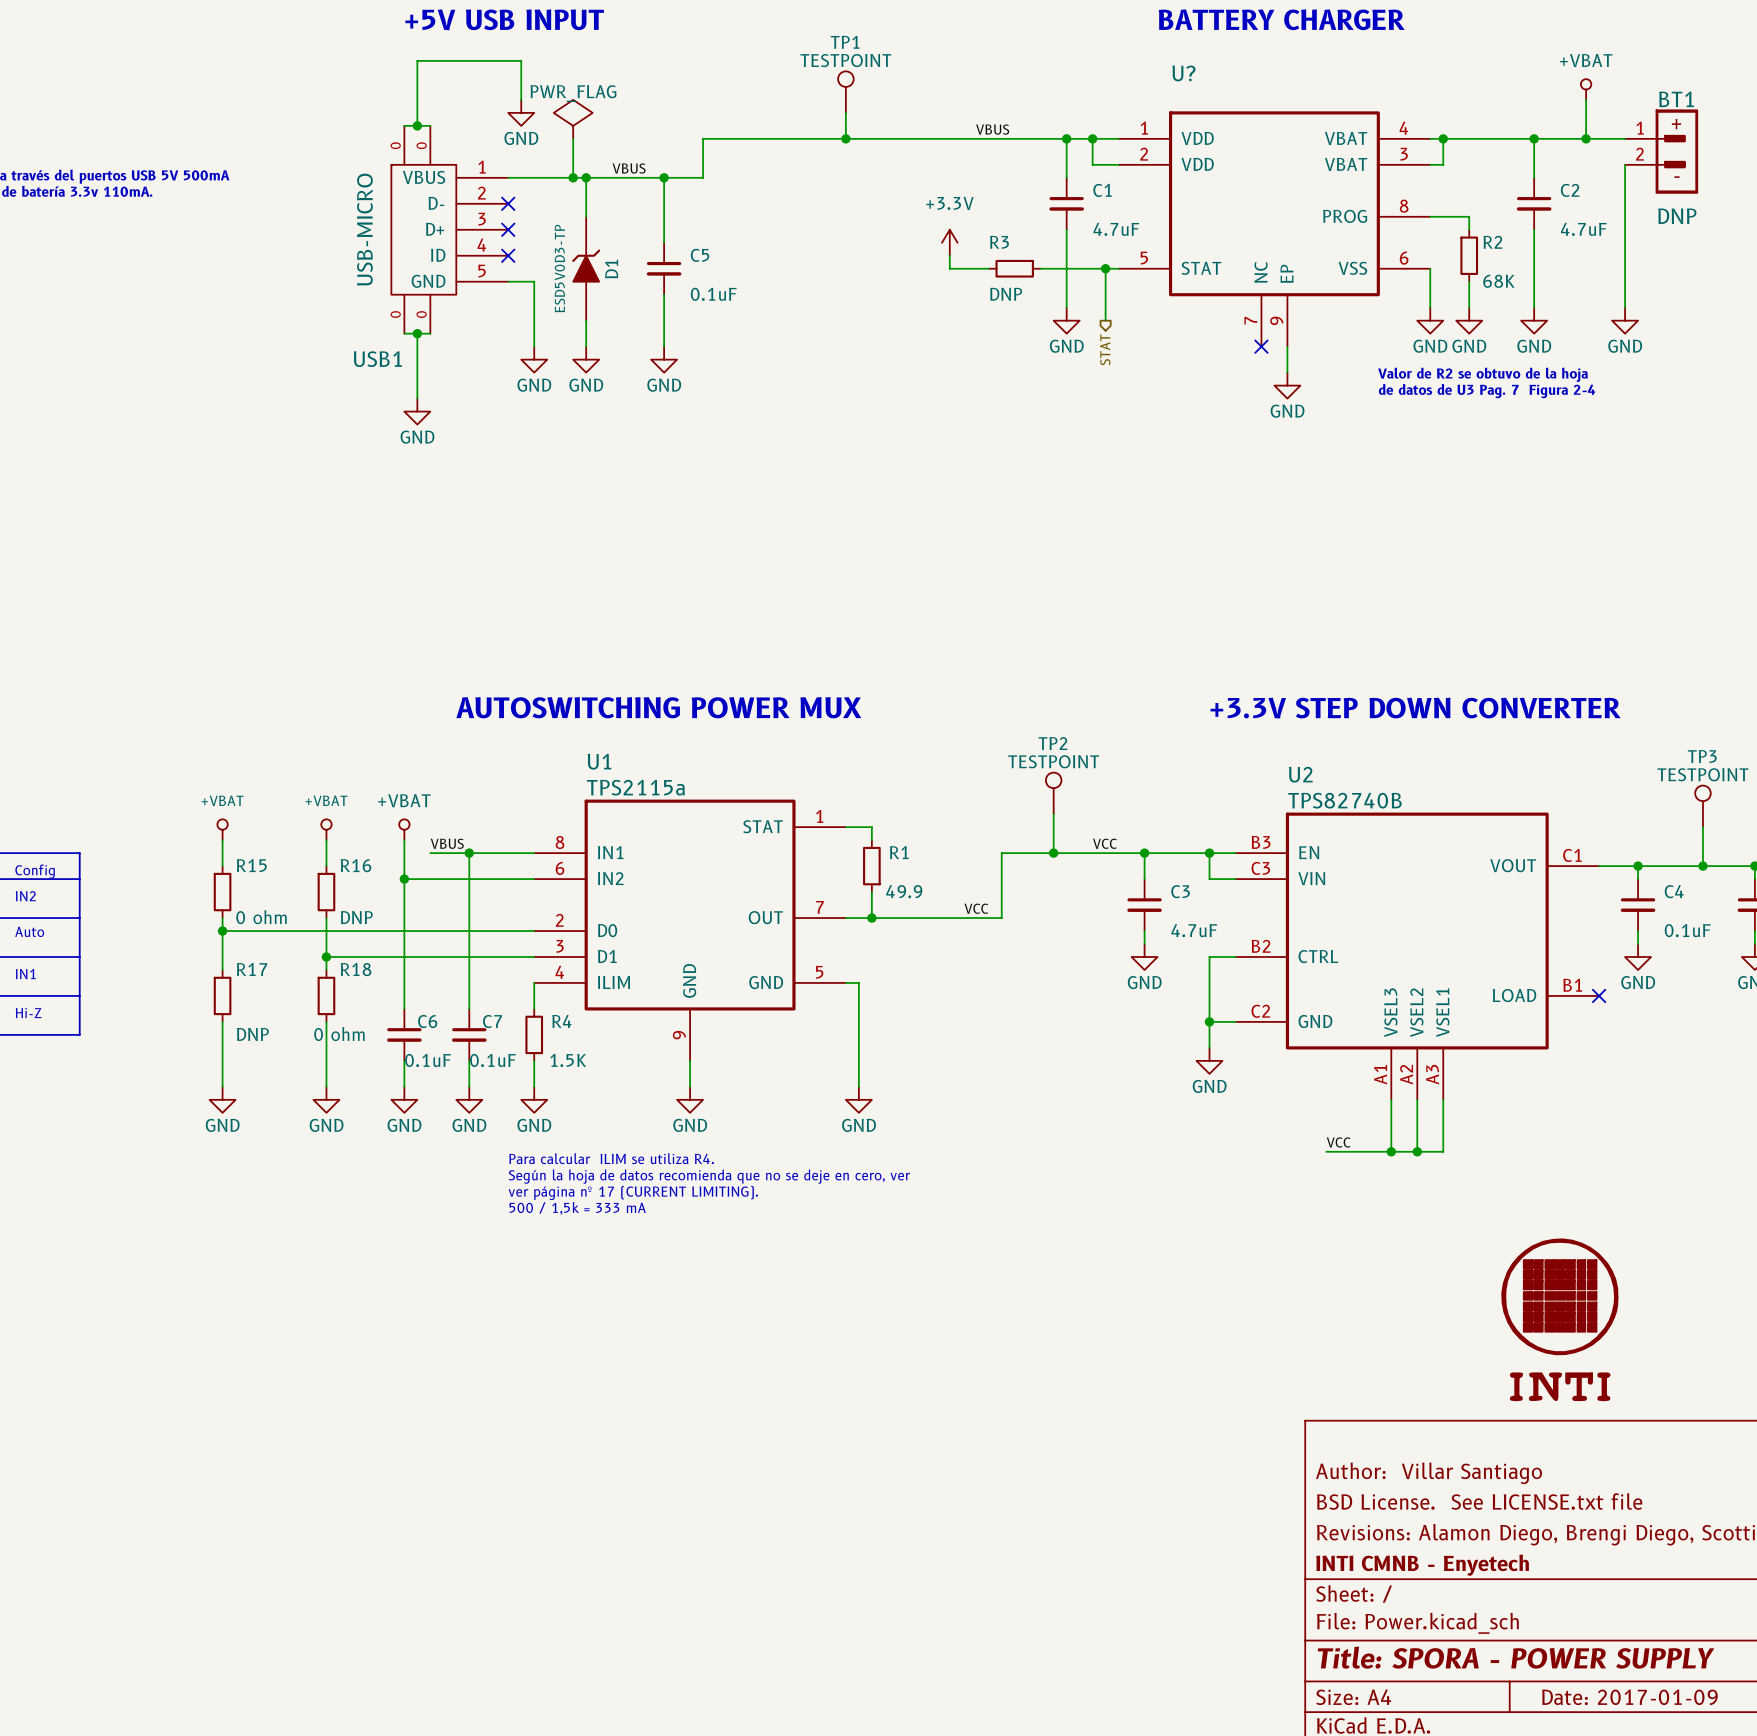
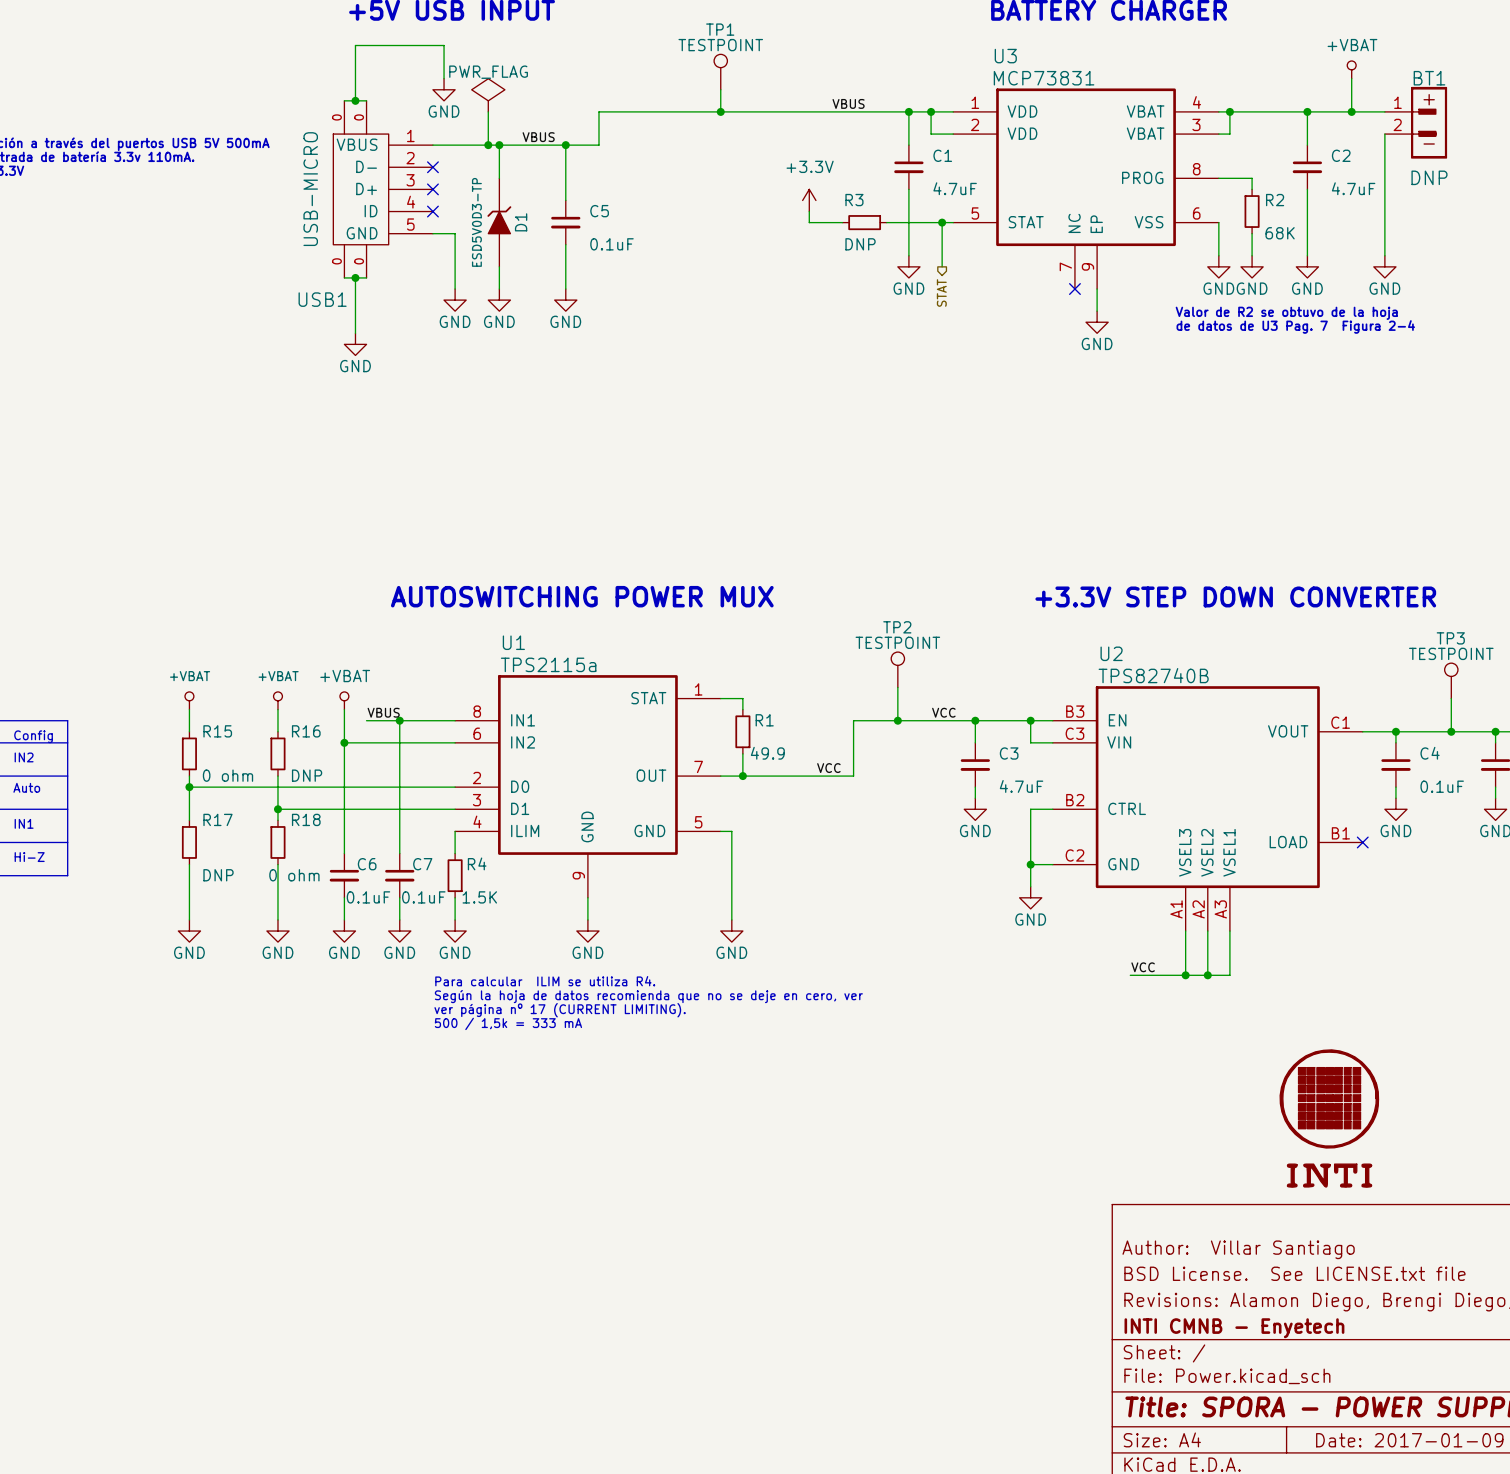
U? name: U? (1183, 73) -> U3 (1005, 56)
U? value: none -> MCP73831 (1044, 78)

